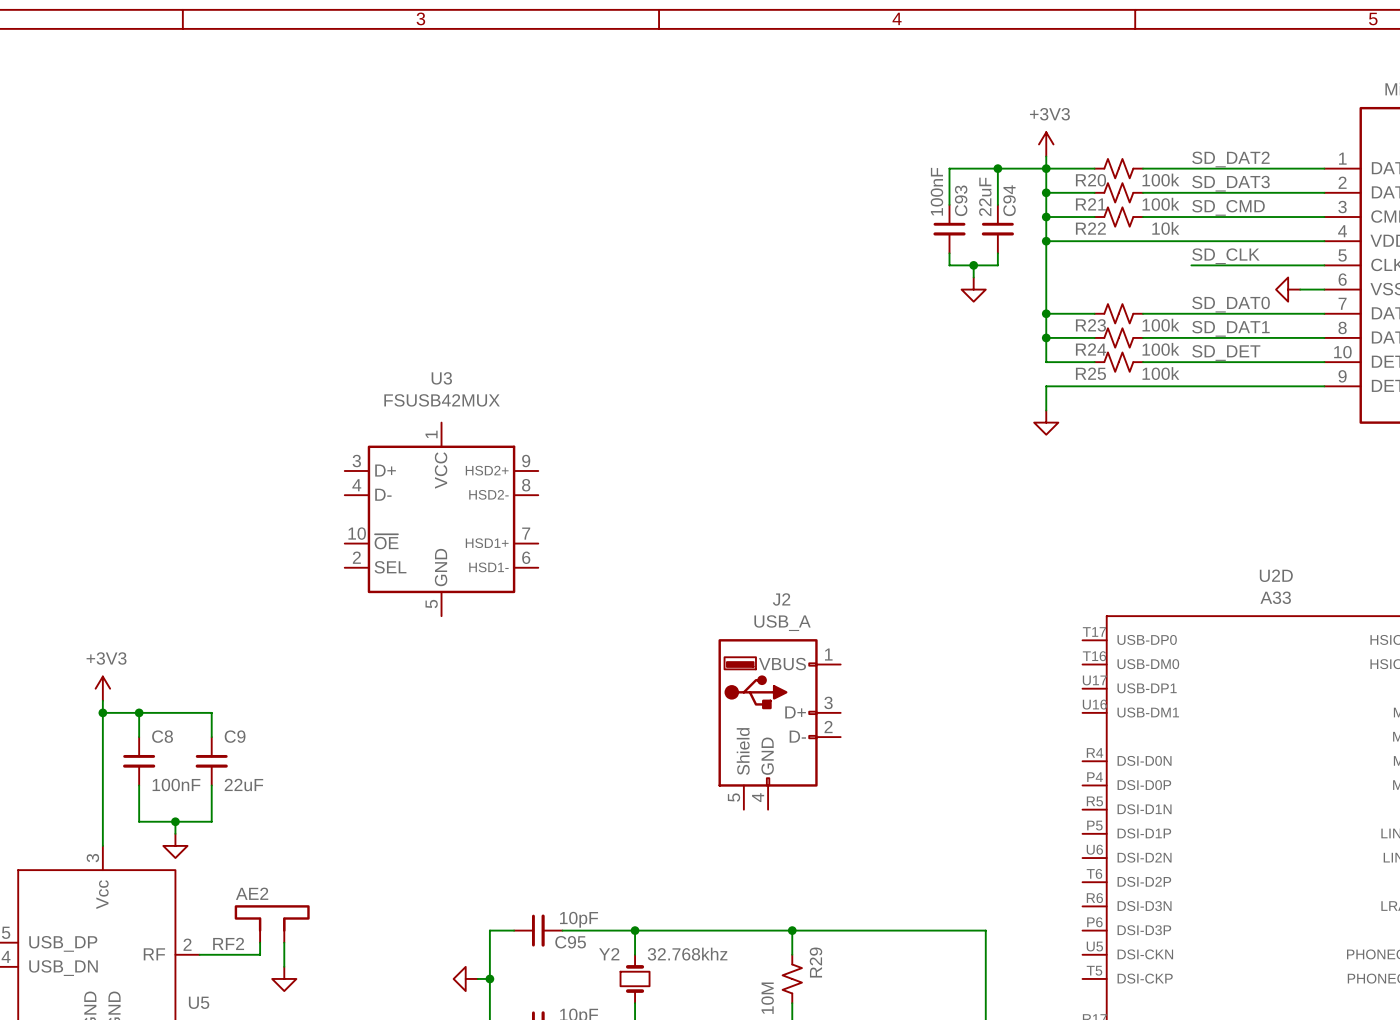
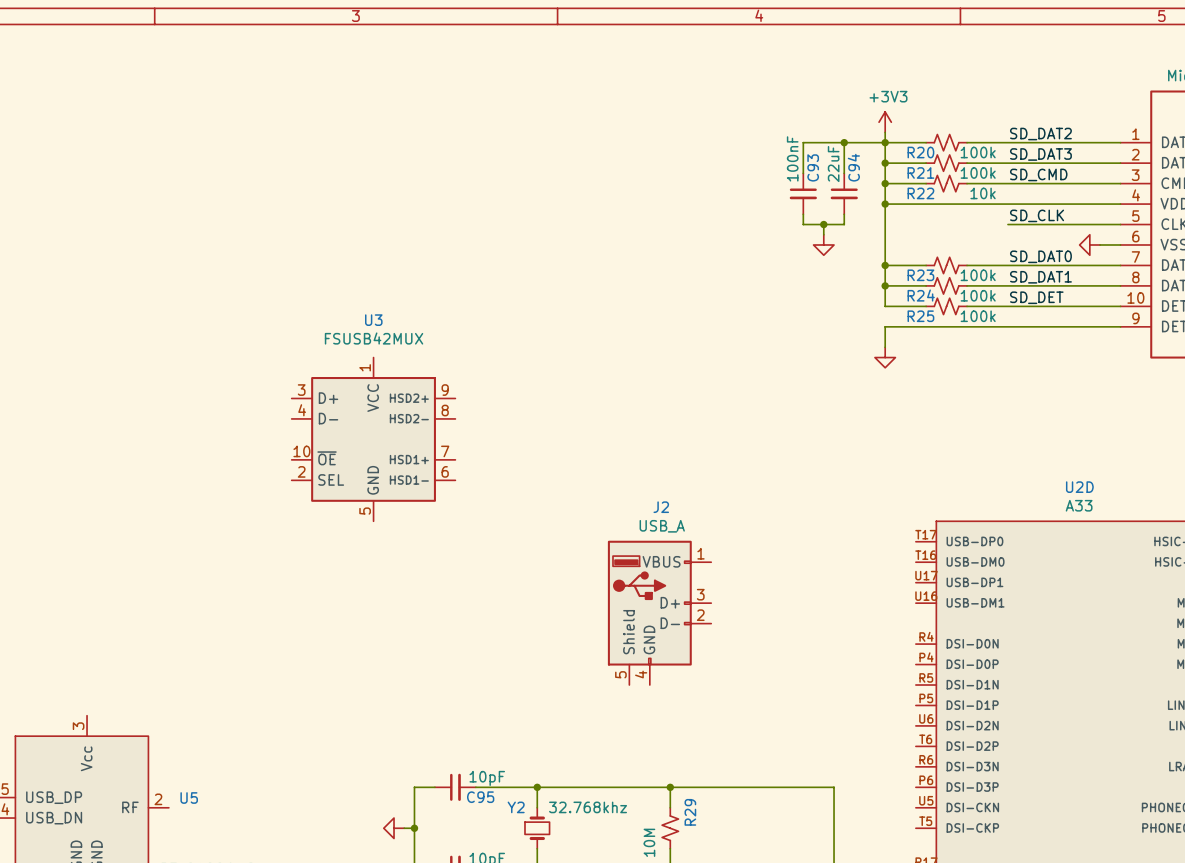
power symbol: +3V3 (102, 688) -> none
wire: (102, 700) (102, 845) -> none
wire: (102, 712) (211, 712) (211, 737) -> none
junction: (102, 712) -> none
wire: (139, 712) (139, 737) -> none
junction: (139, 712) -> none
C8: 100nF (139, 761) -> none
C9: 22uF (211, 761) -> none
wire: (139, 785) (139, 821) (211, 821) (211, 785) -> none
wire: (175, 821) (175, 833) -> none
junction: (175, 821) -> none
power symbol: (175, 845) -> none
AE2: (272, 923) -> none
wire: (260, 942) (260, 954) (199, 954) -> none
wire: (284, 942) (284, 966) -> none
label: RF2 (228, 943) -> none
power symbol: (284, 978) -> none
U5 name position: U5 (199, 1002) -> U5 (189, 798)

